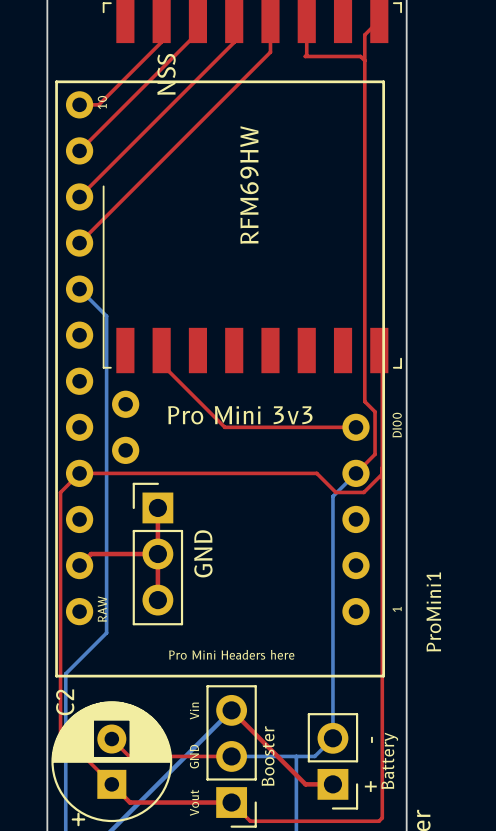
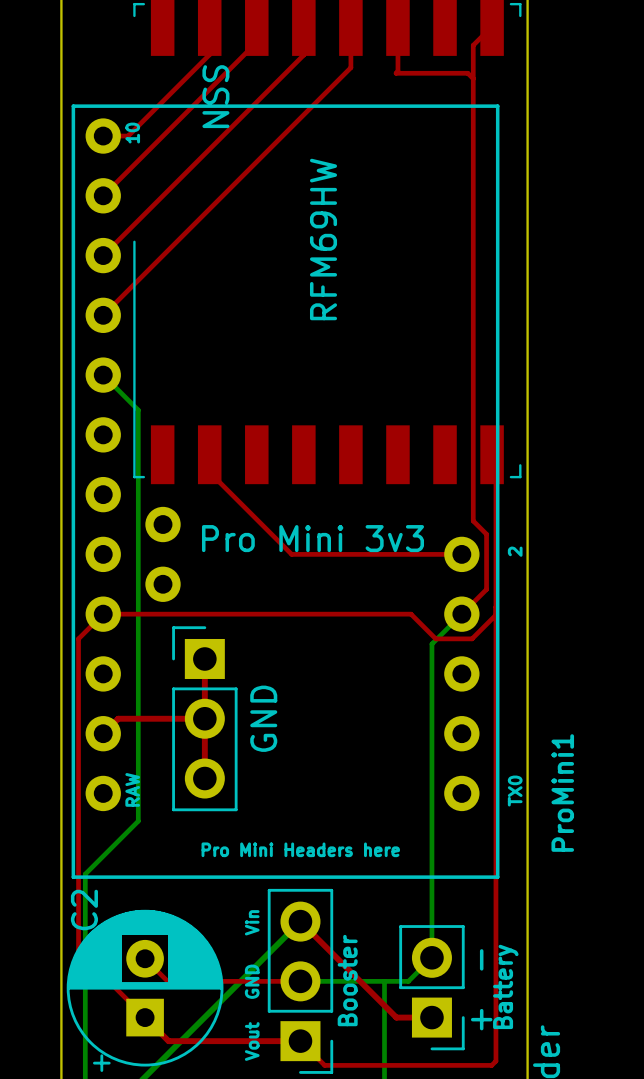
text: DI00 (397, 425) -> 2 (515, 551)
text: 1 (397, 609) -> TX0 (515, 791)

